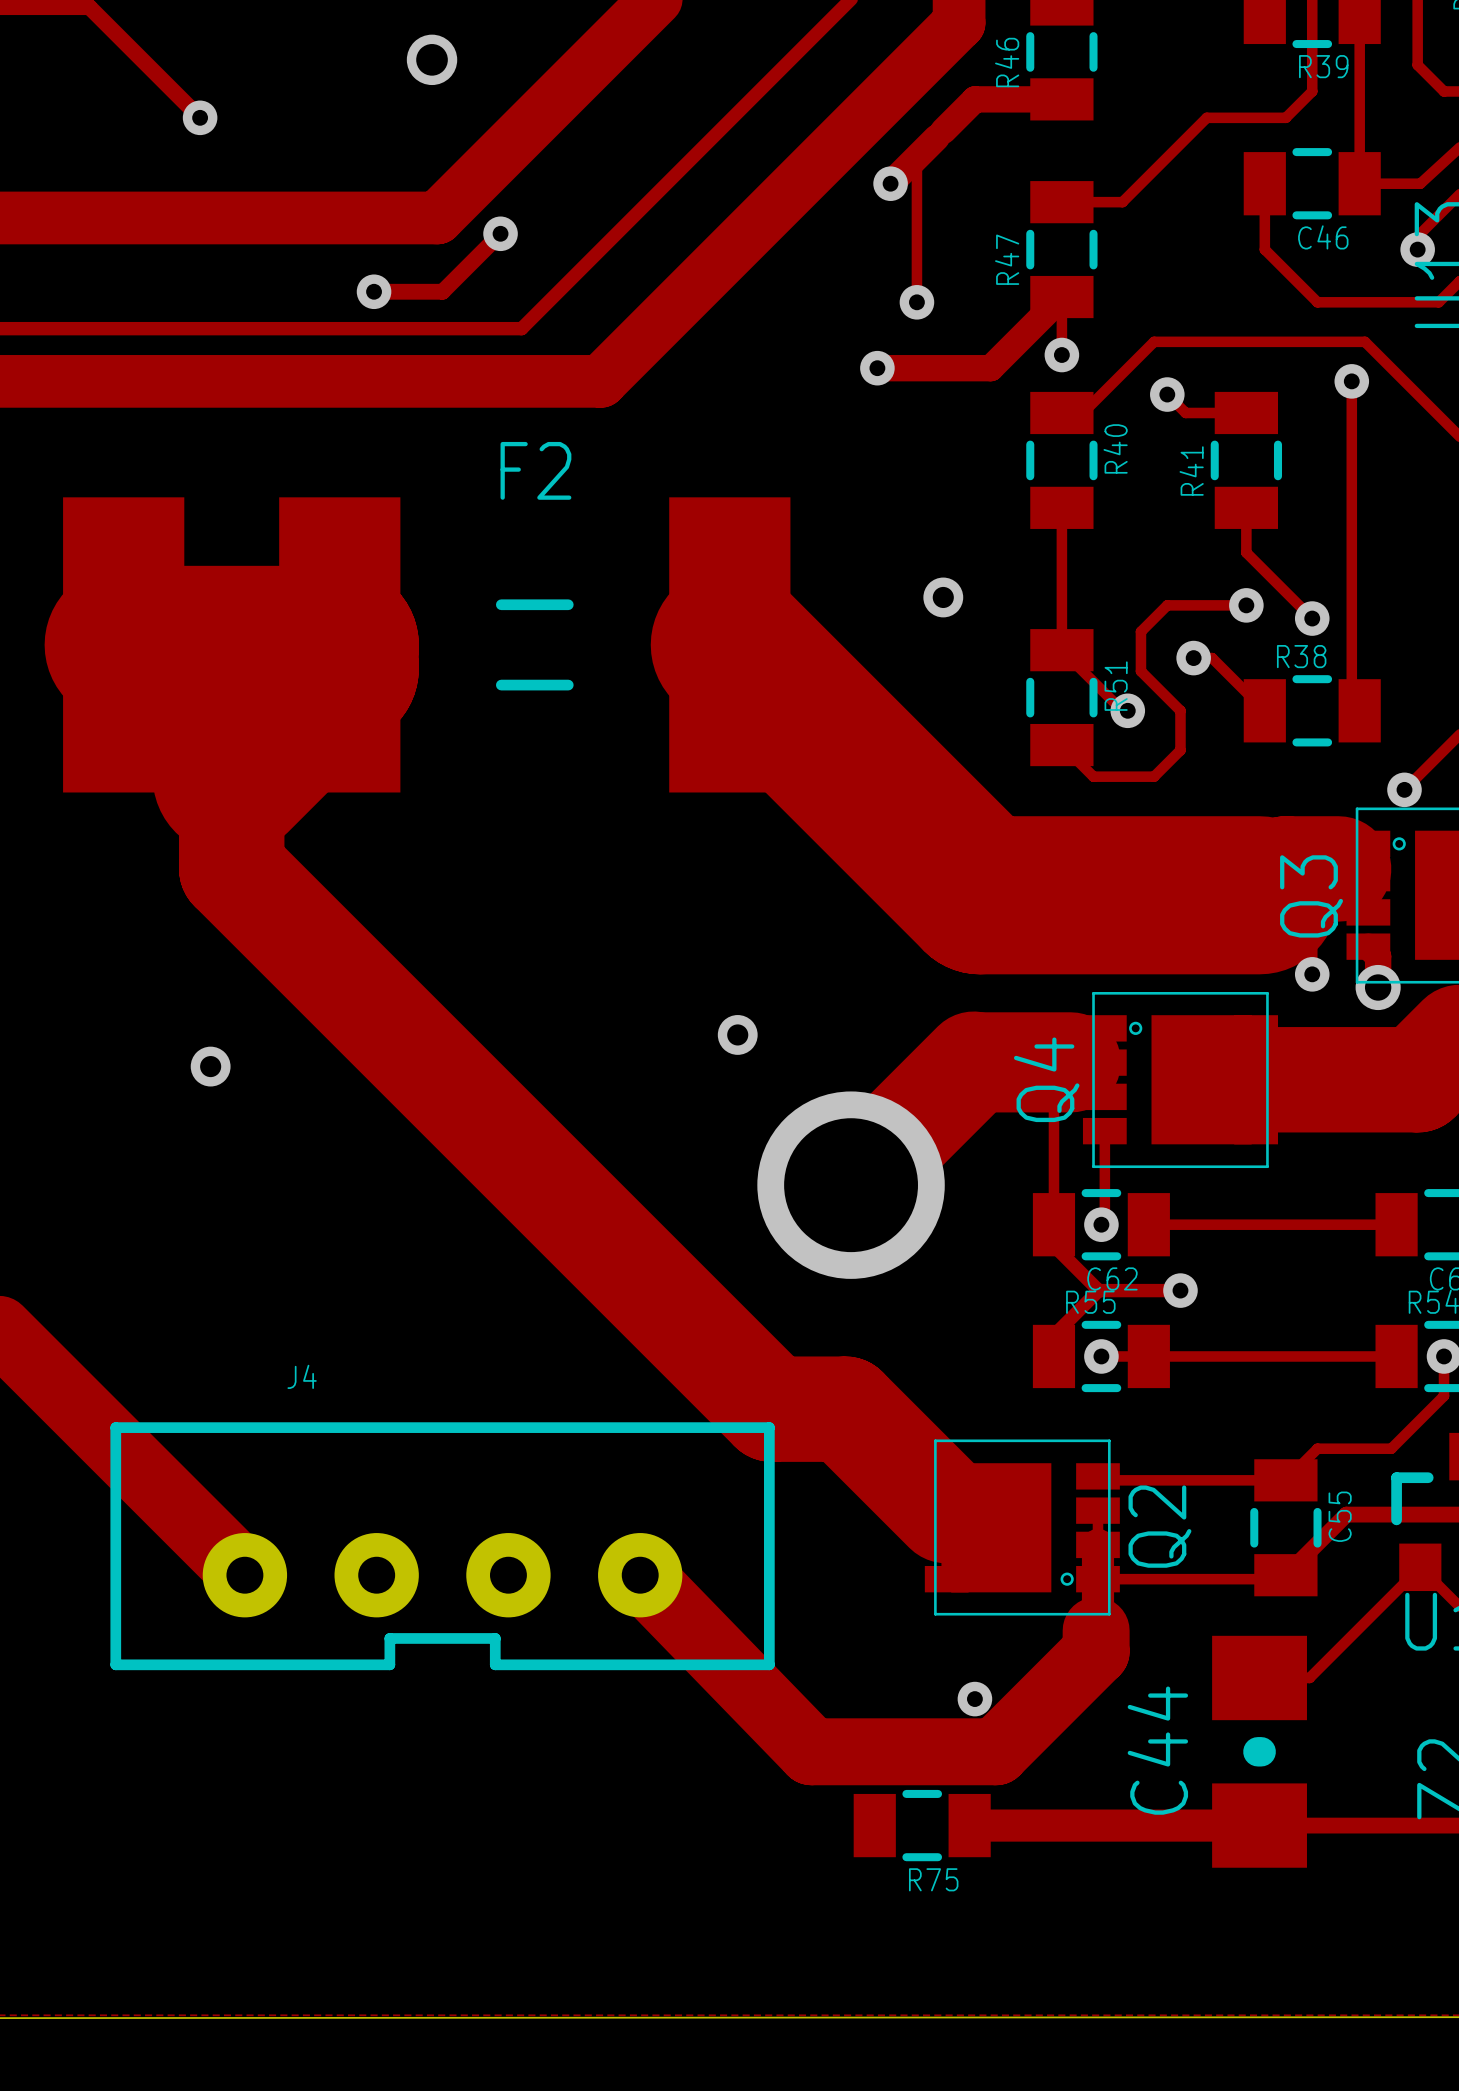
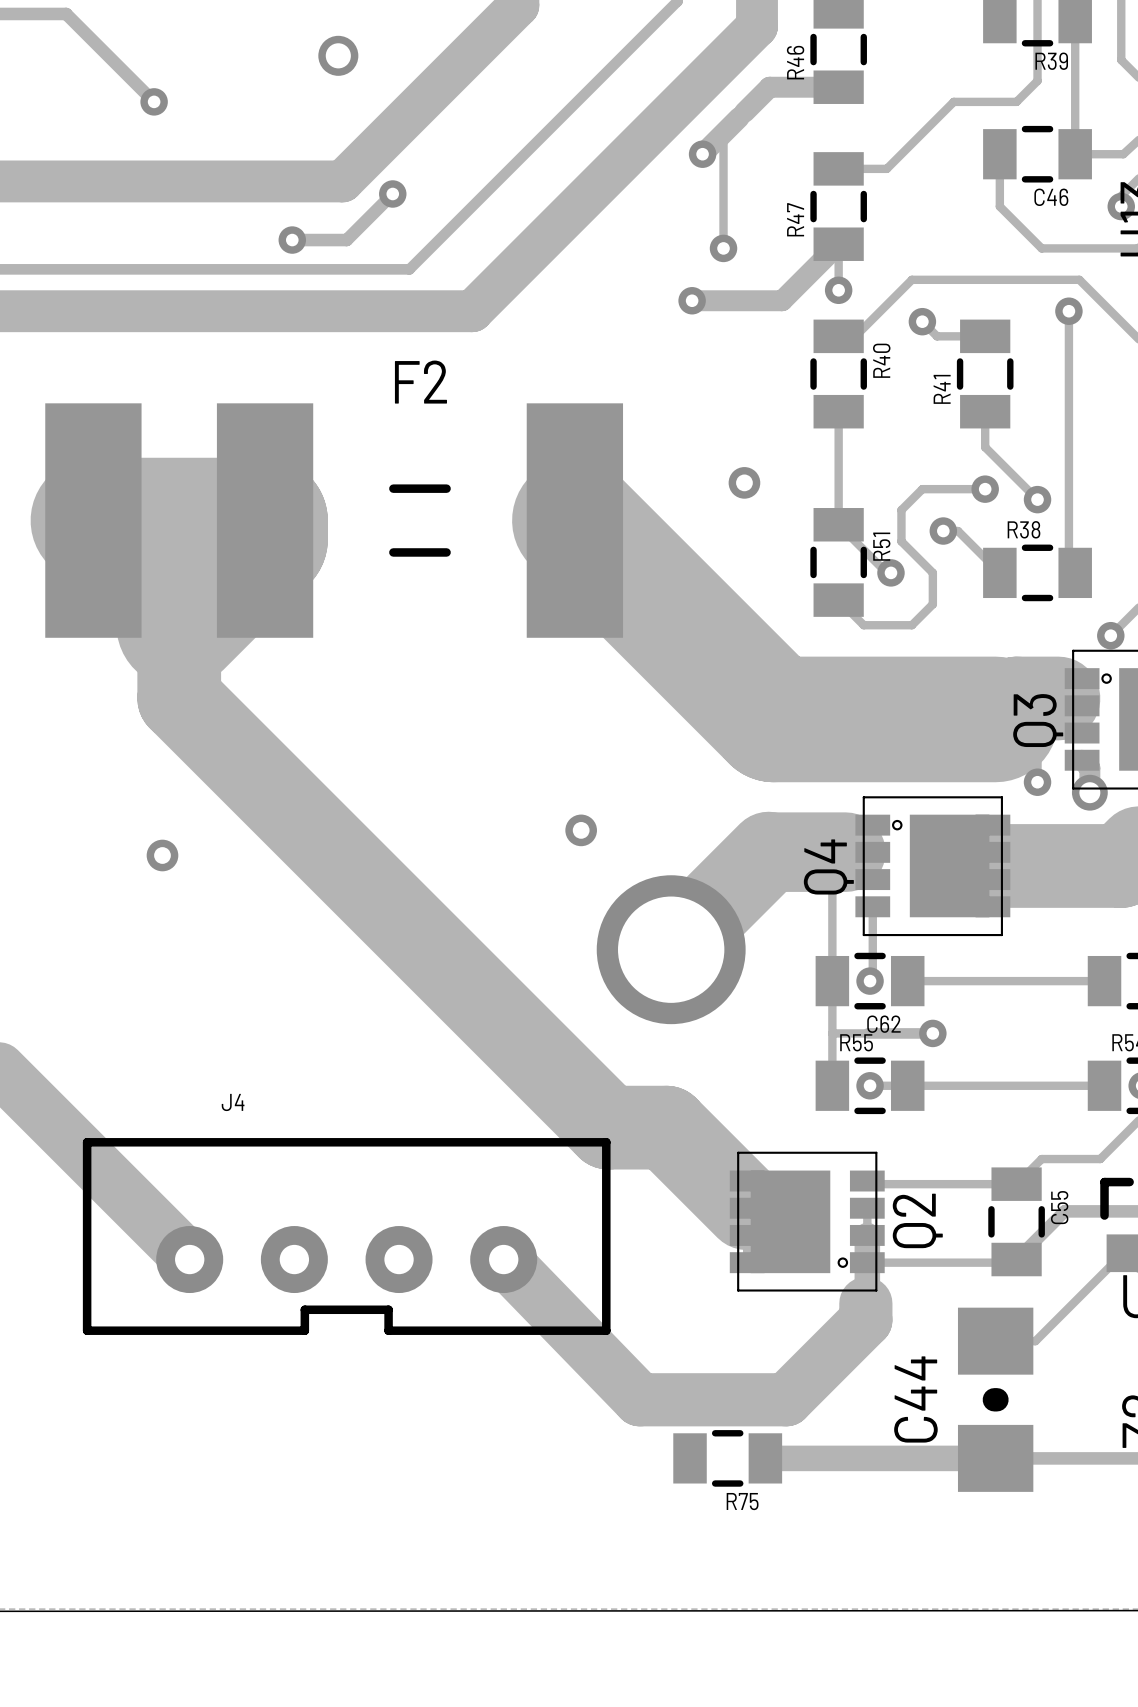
track: (1053, 1245) (1098, 1290) (1053, 1335) -> (832, 997) (832, 1069)
track: none -> (832, 1033) (867, 1033)
via: (974, 1699) -> none

